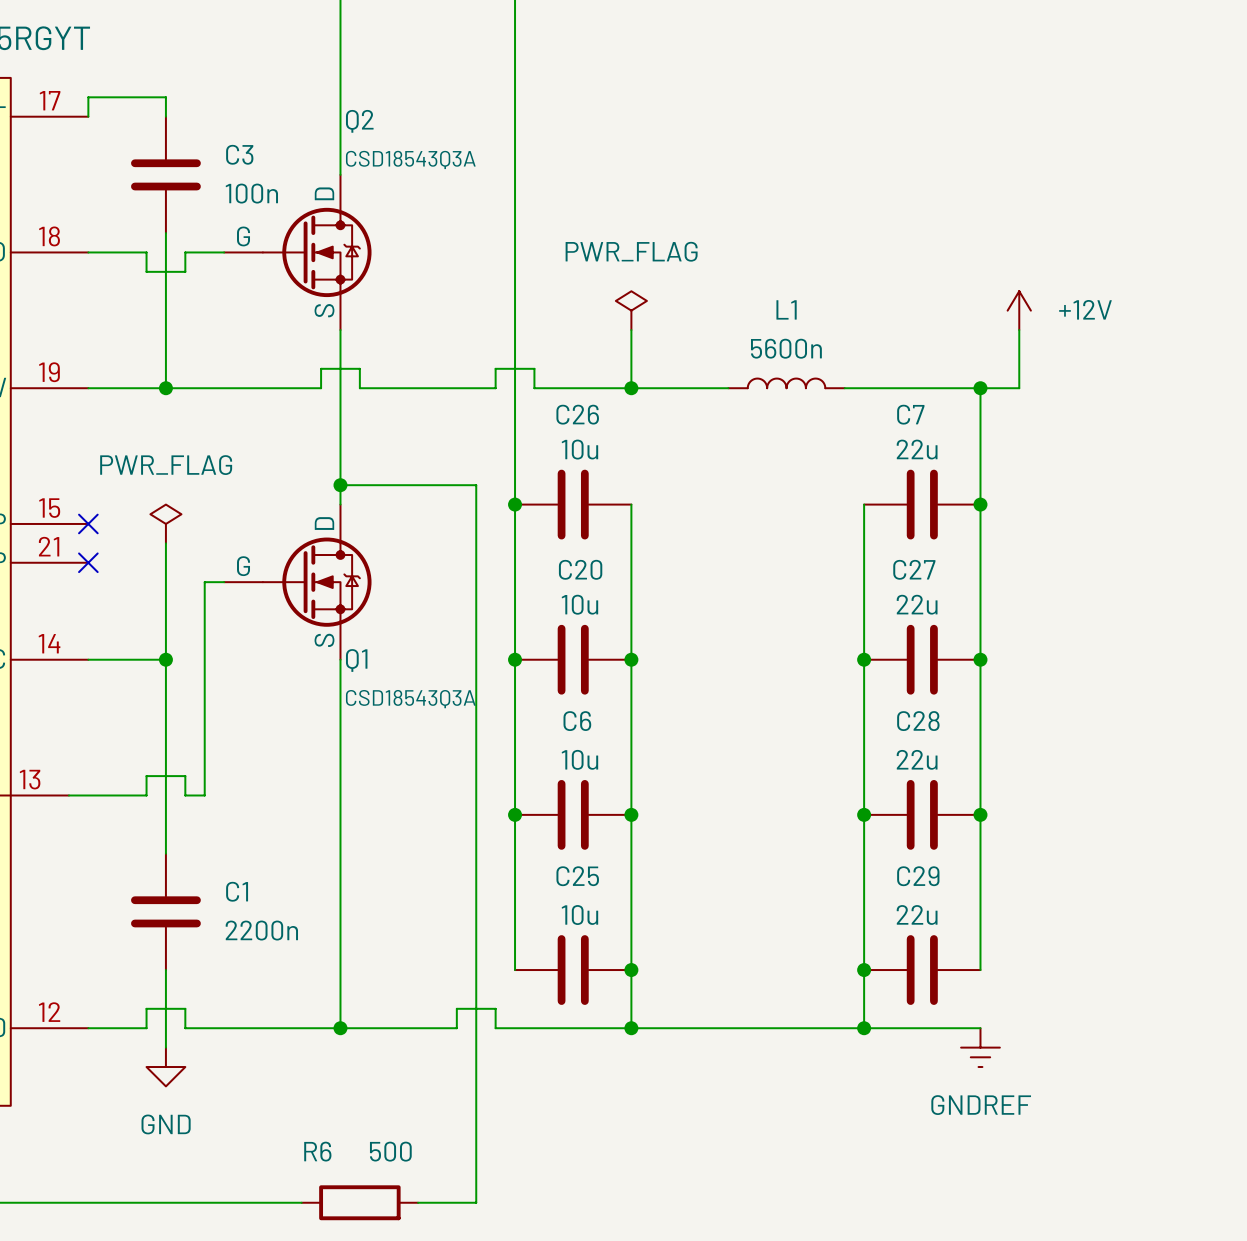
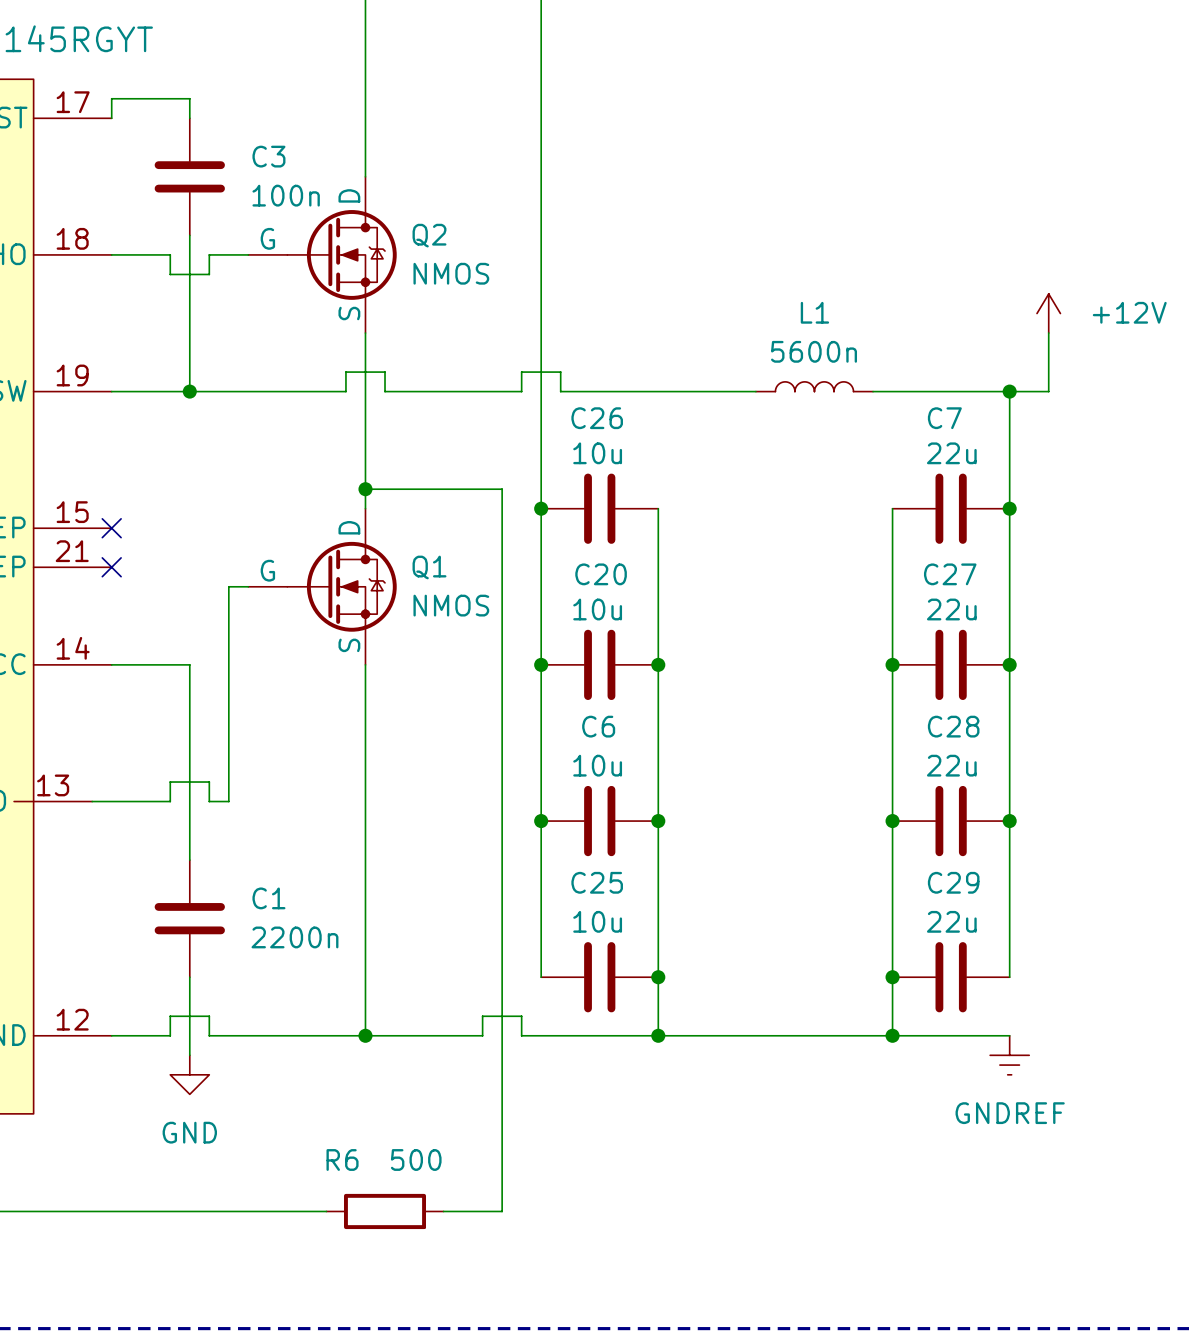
Q2 name position: Q2 (359, 121) -> Q2 (429, 235)
Q2 value: CSD18543Q3A (410, 159) -> NMOS (451, 273)
power symbol: PWR_FLAG (631, 310) -> none
wire: (631, 330) (631, 388) -> none
junction: (631, 388) -> none
power symbol: PWR_FLAG (165, 523) -> none
wire: (165, 543) (165, 659) -> none
junction: (165, 659) -> none
Q1 name position: Q1 (356, 660) -> Q1 (429, 567)
Q1 value: CSD18543Q3A (410, 699) -> NMOS (451, 605)

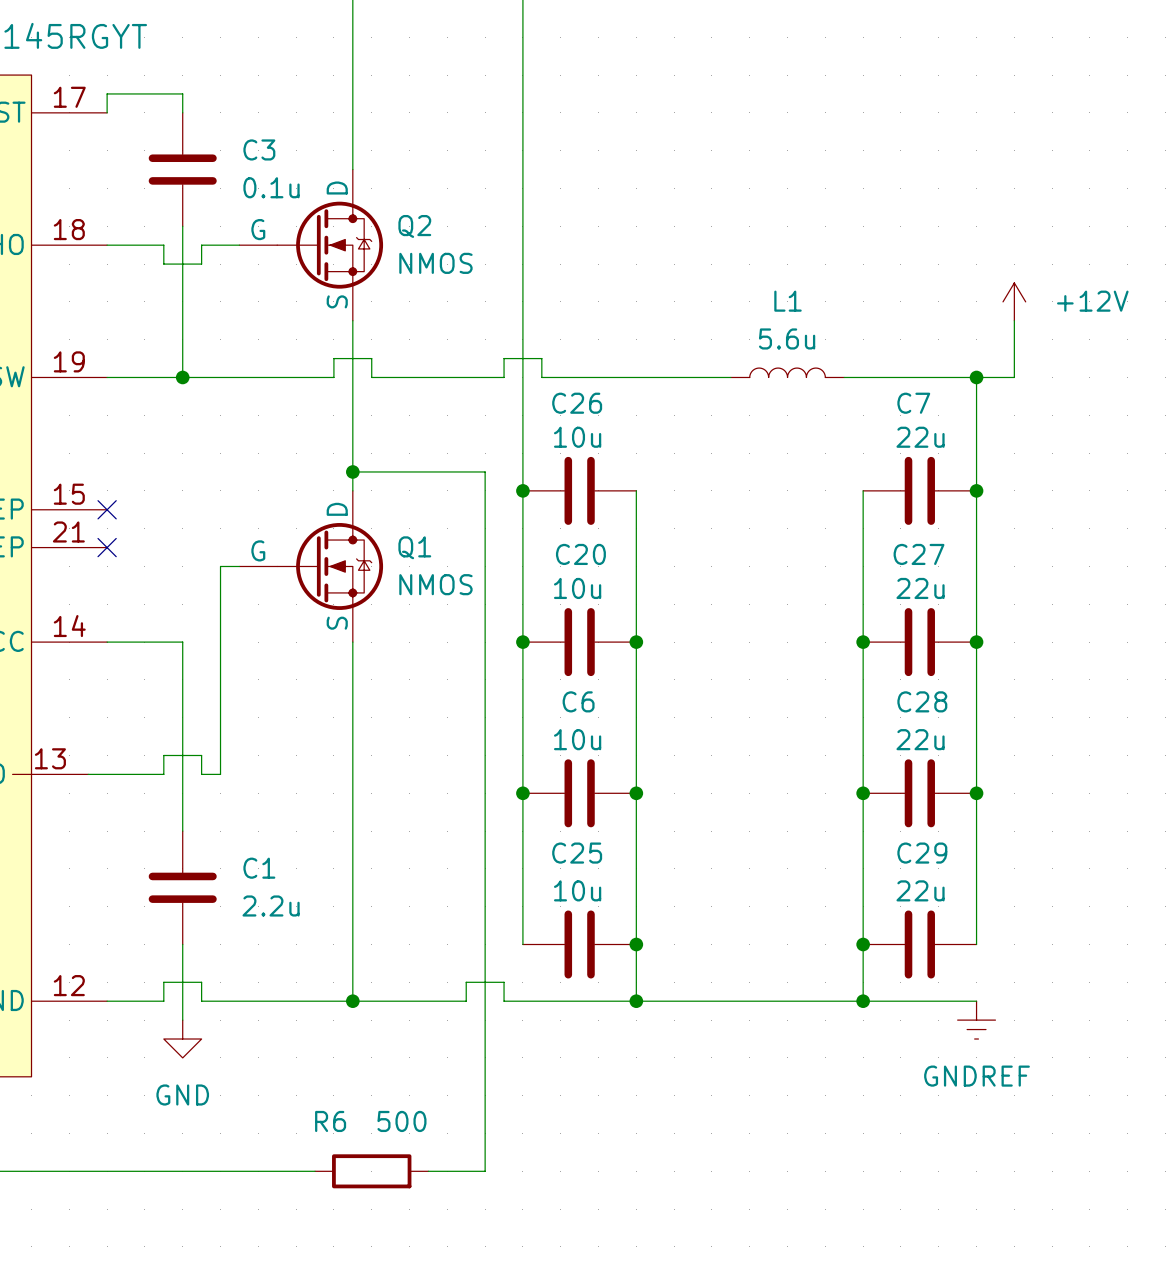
C3 value: 100n (286, 195) -> 0.1u (271, 187)
L1 value: 5600n (814, 351) -> 5.6u (787, 338)
C1 value: 2200n (294, 937) -> 2.2u (271, 905)

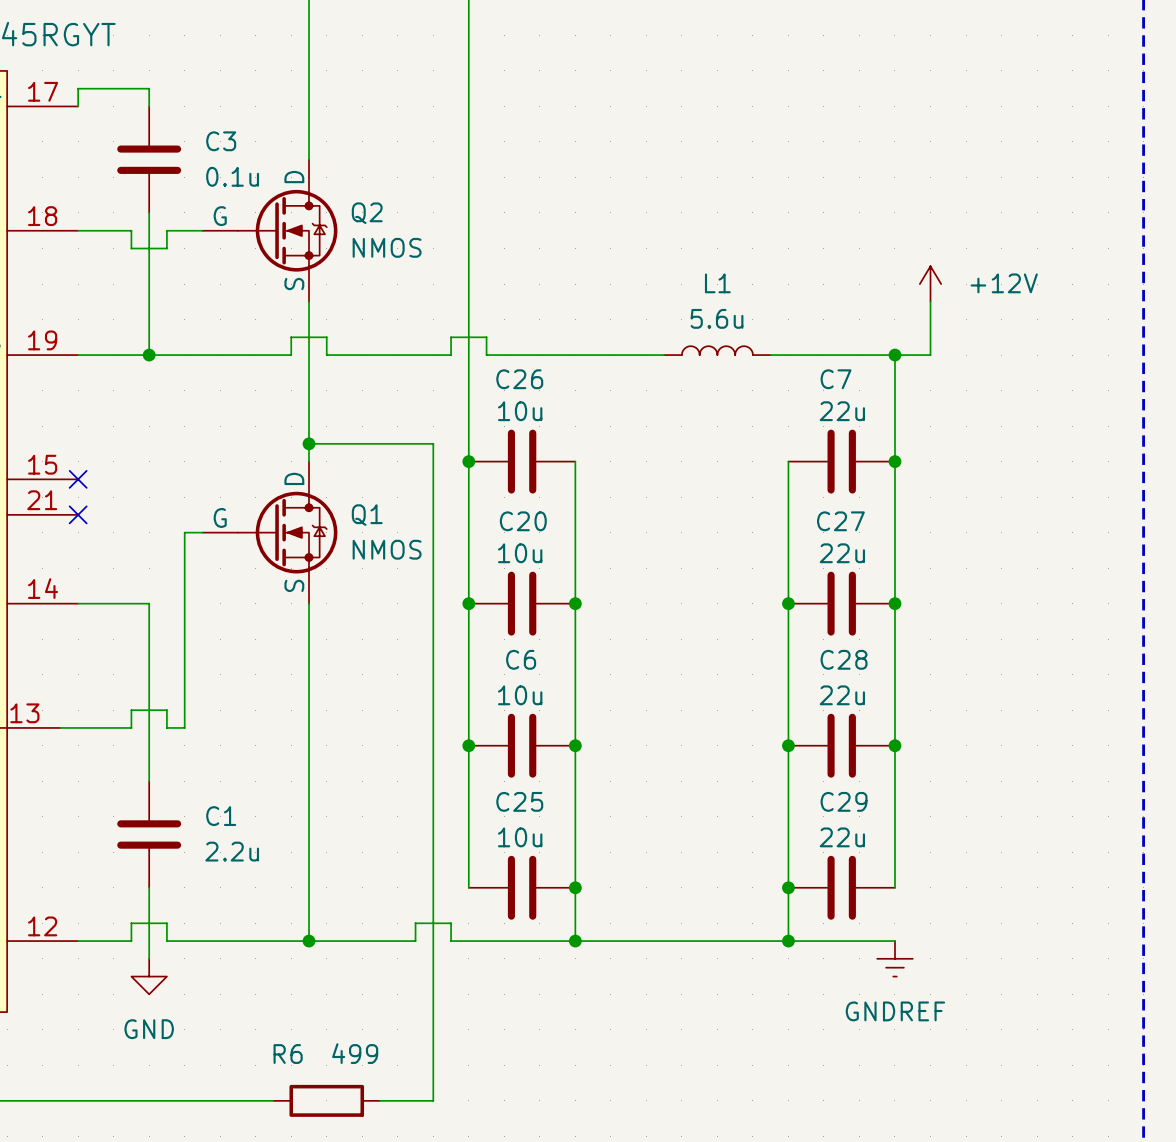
R6 value: 500 (401, 1121) -> 499 (355, 1053)

